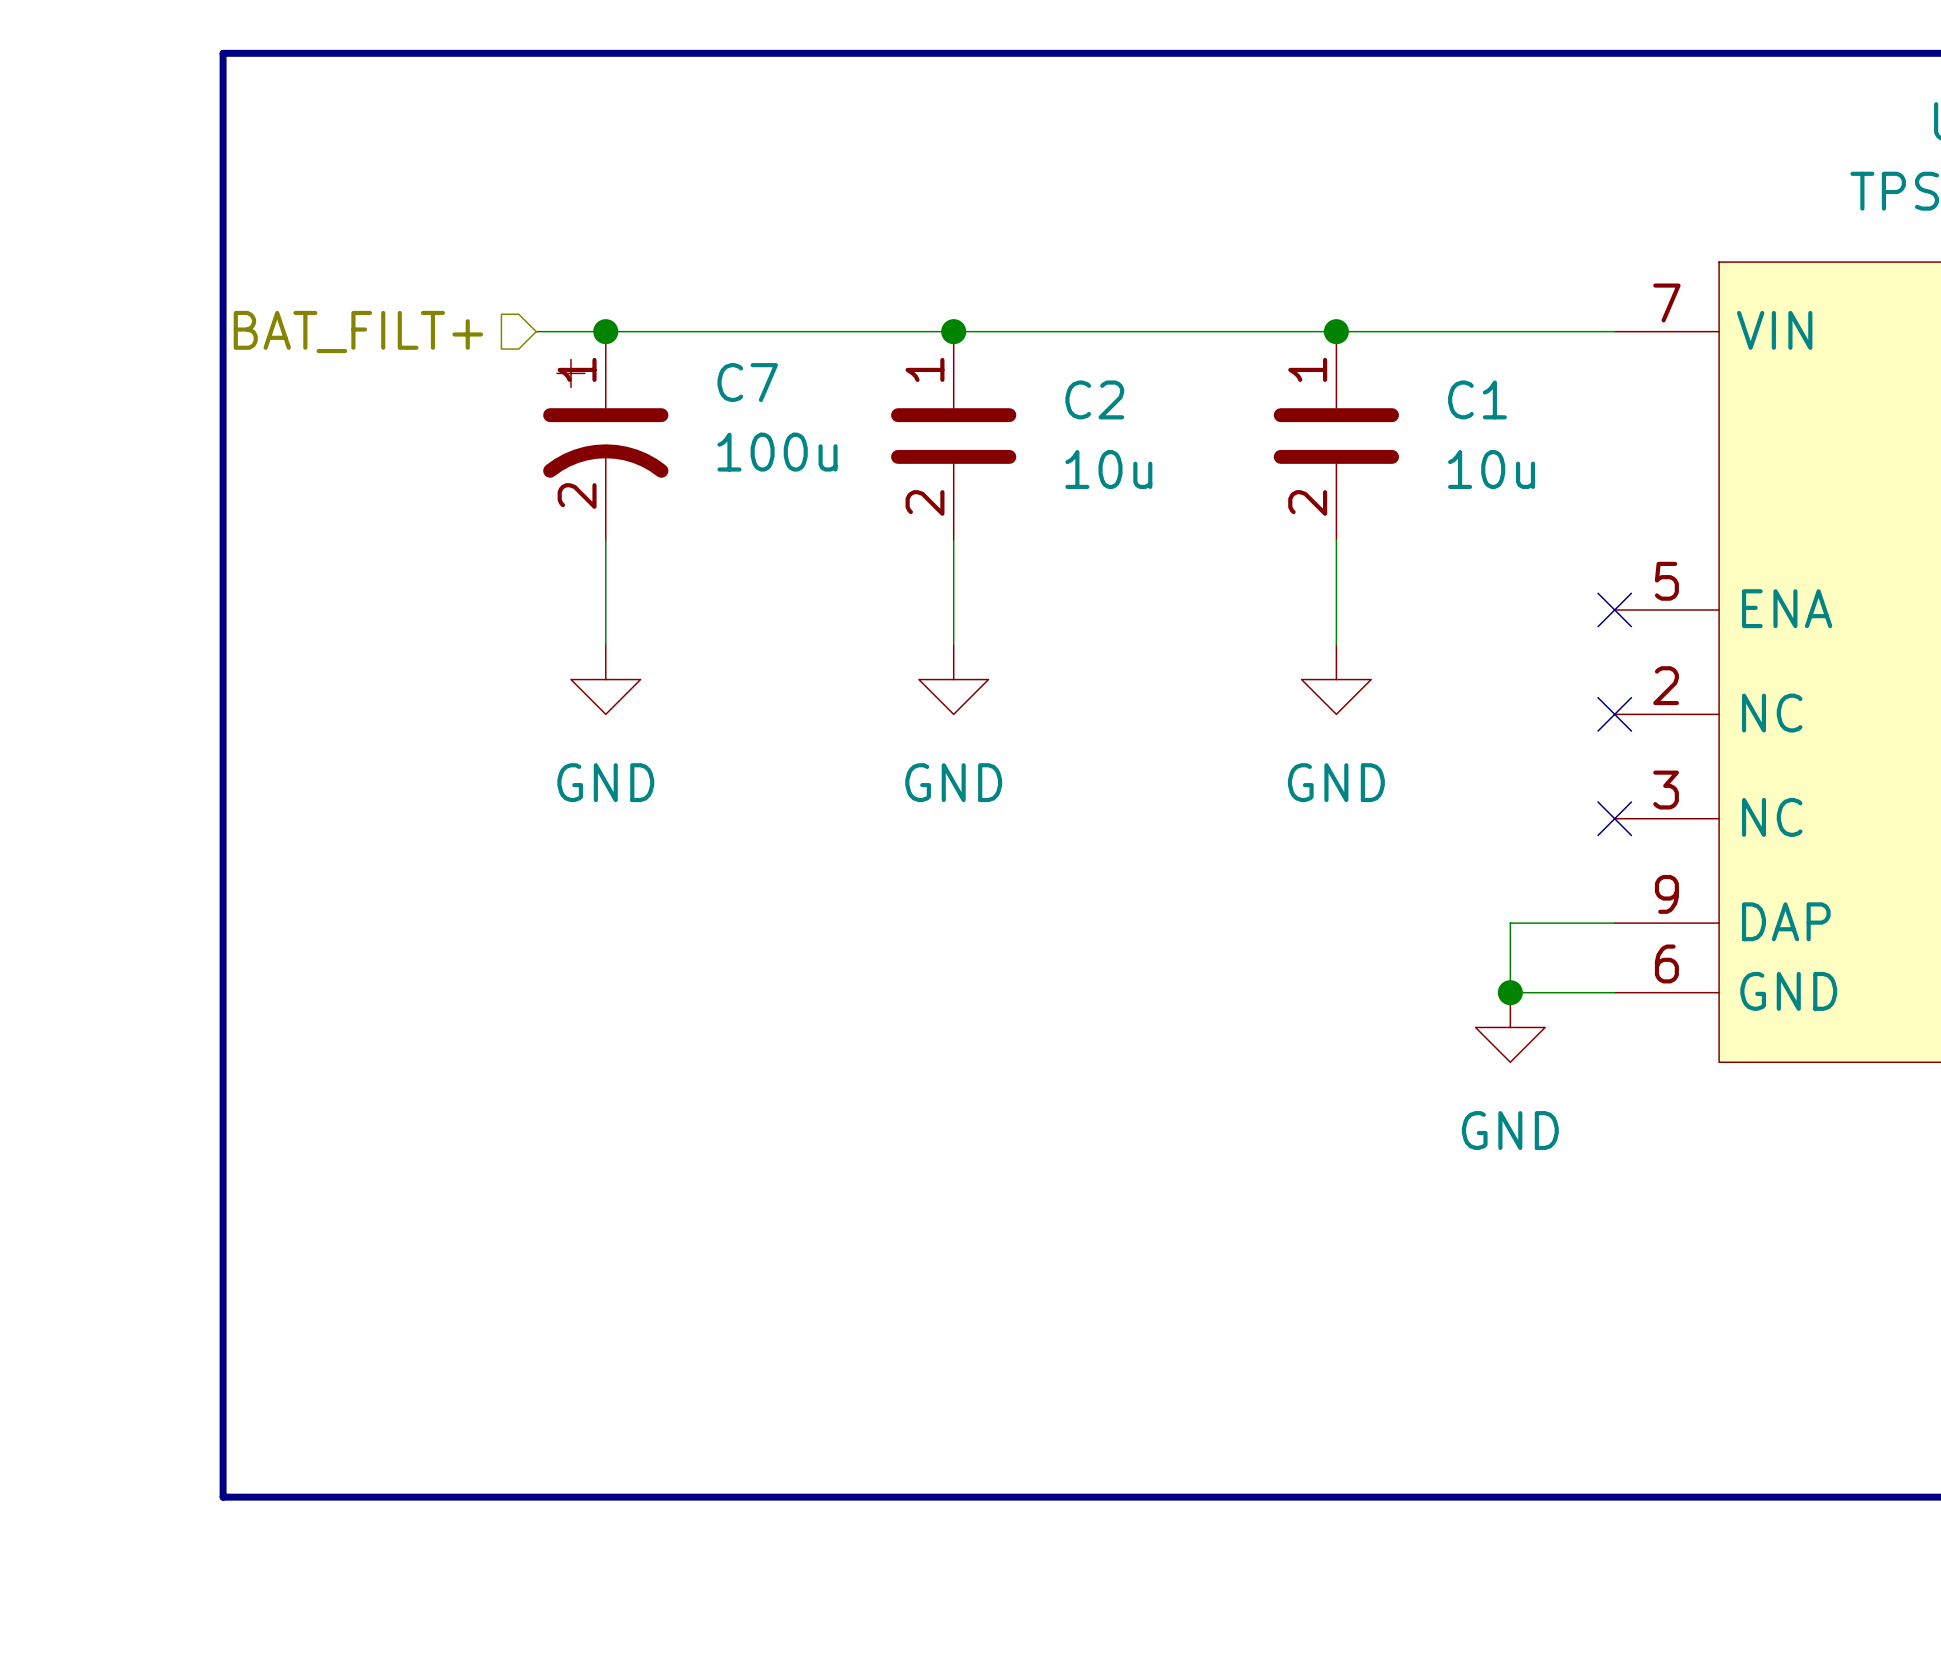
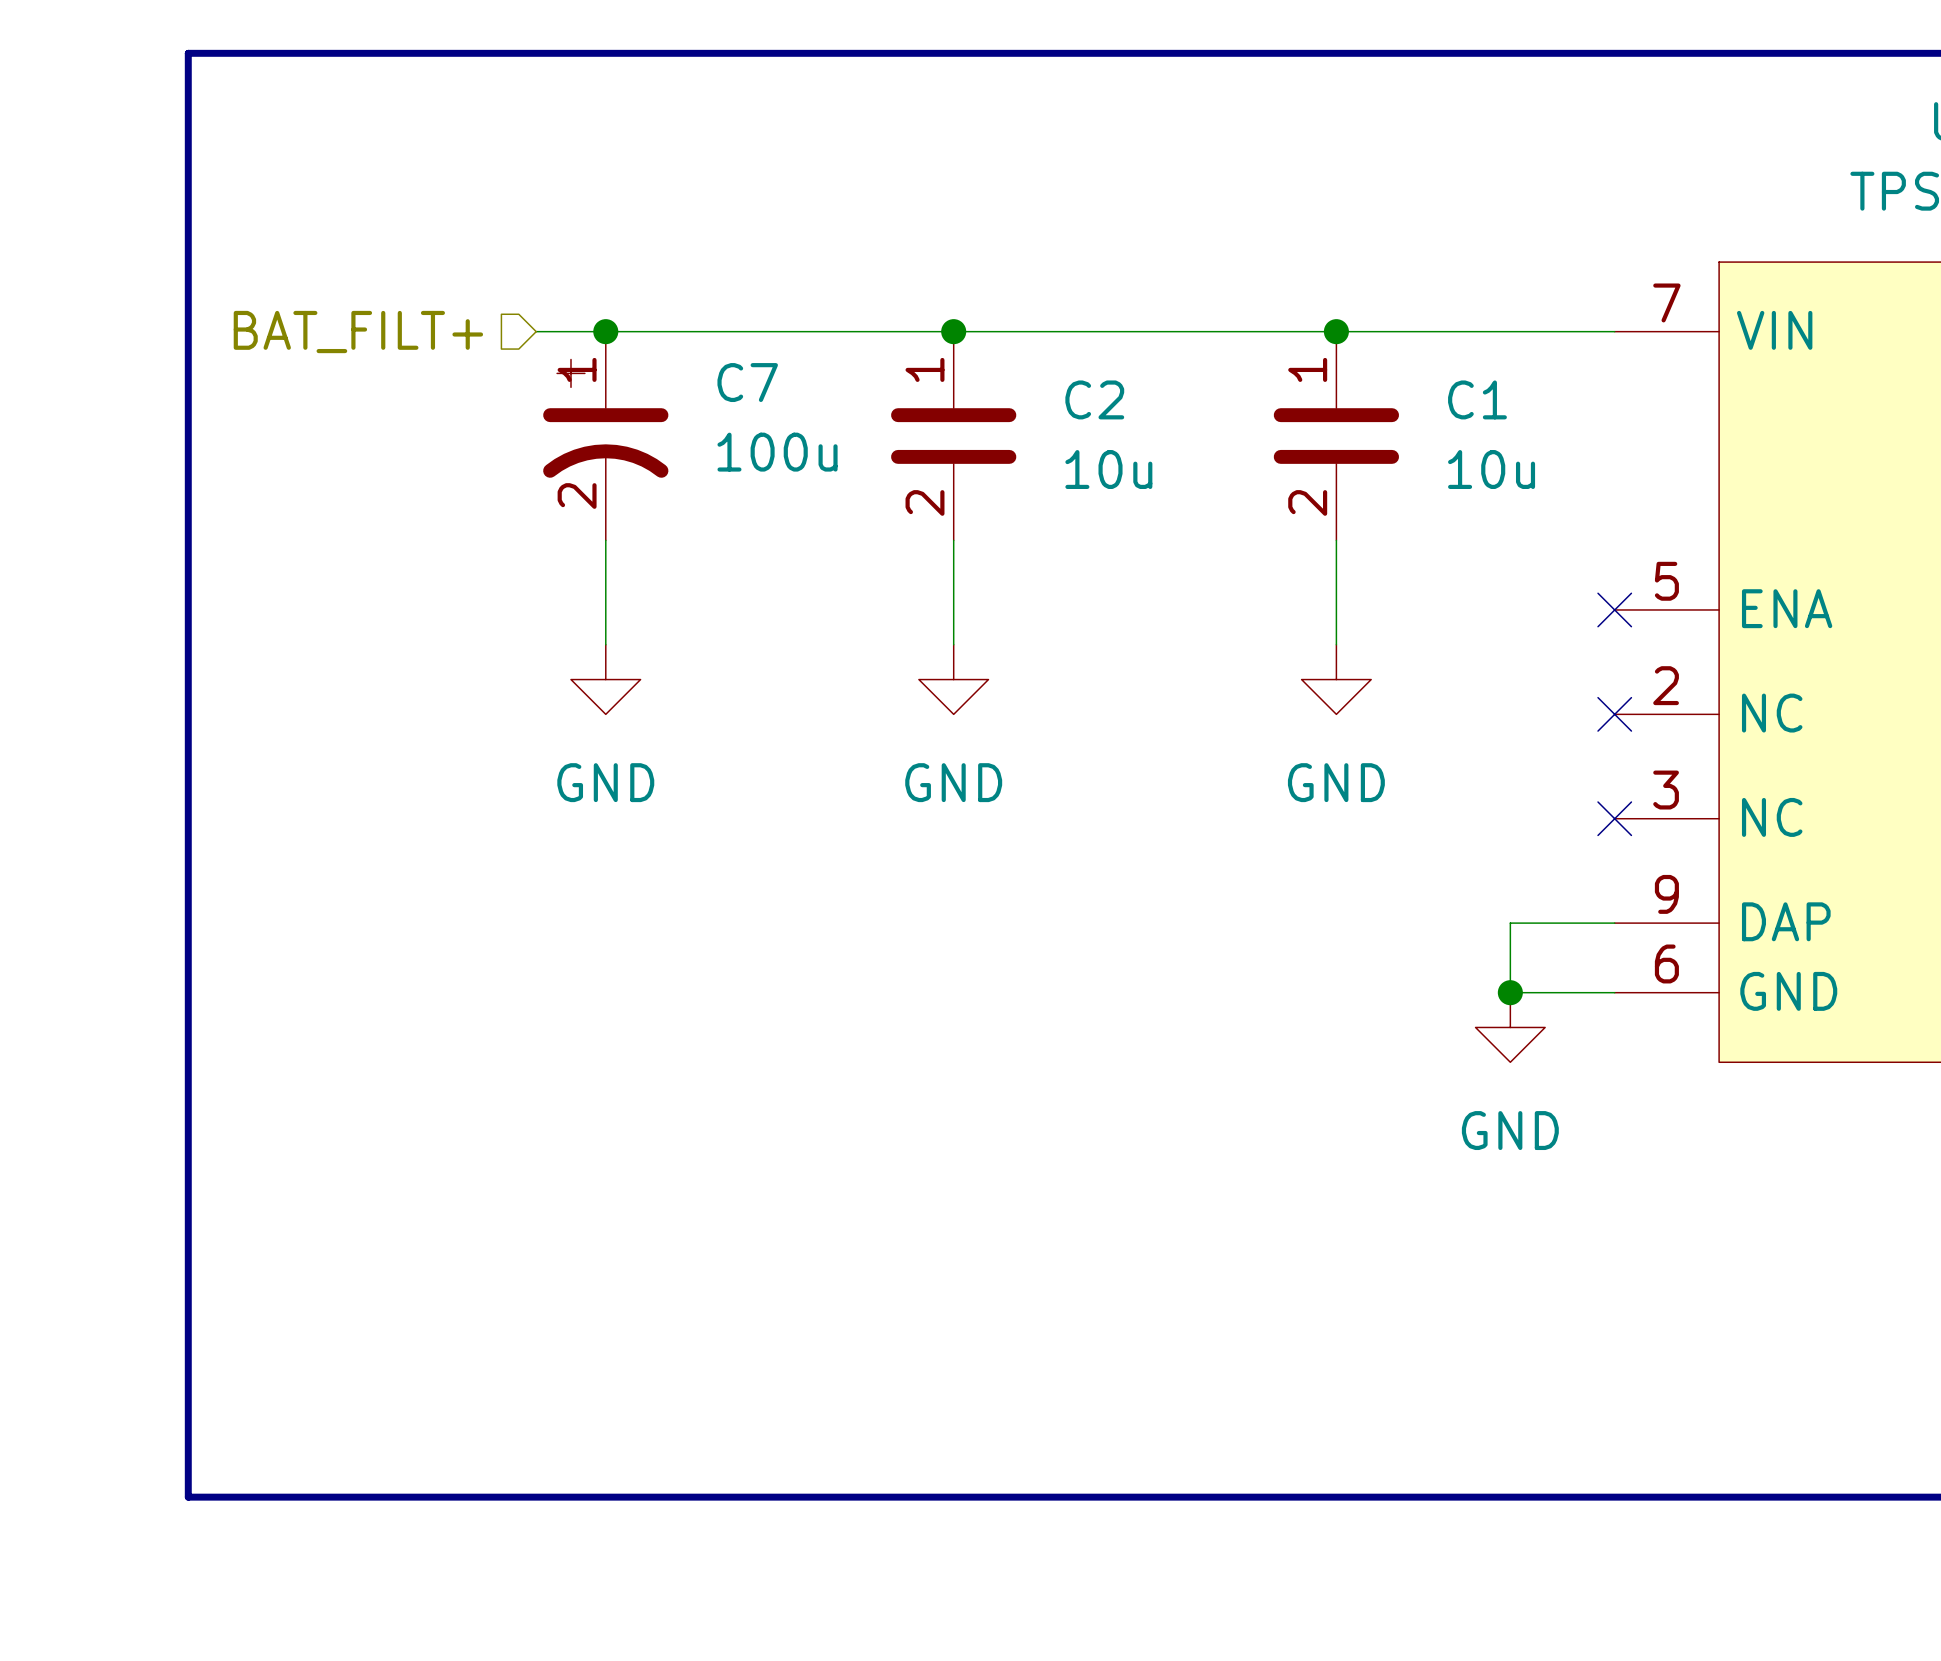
line: (223, 53) (223, 1497) -> (223, 53) (188, 53) (188, 1497) (223, 1497)

